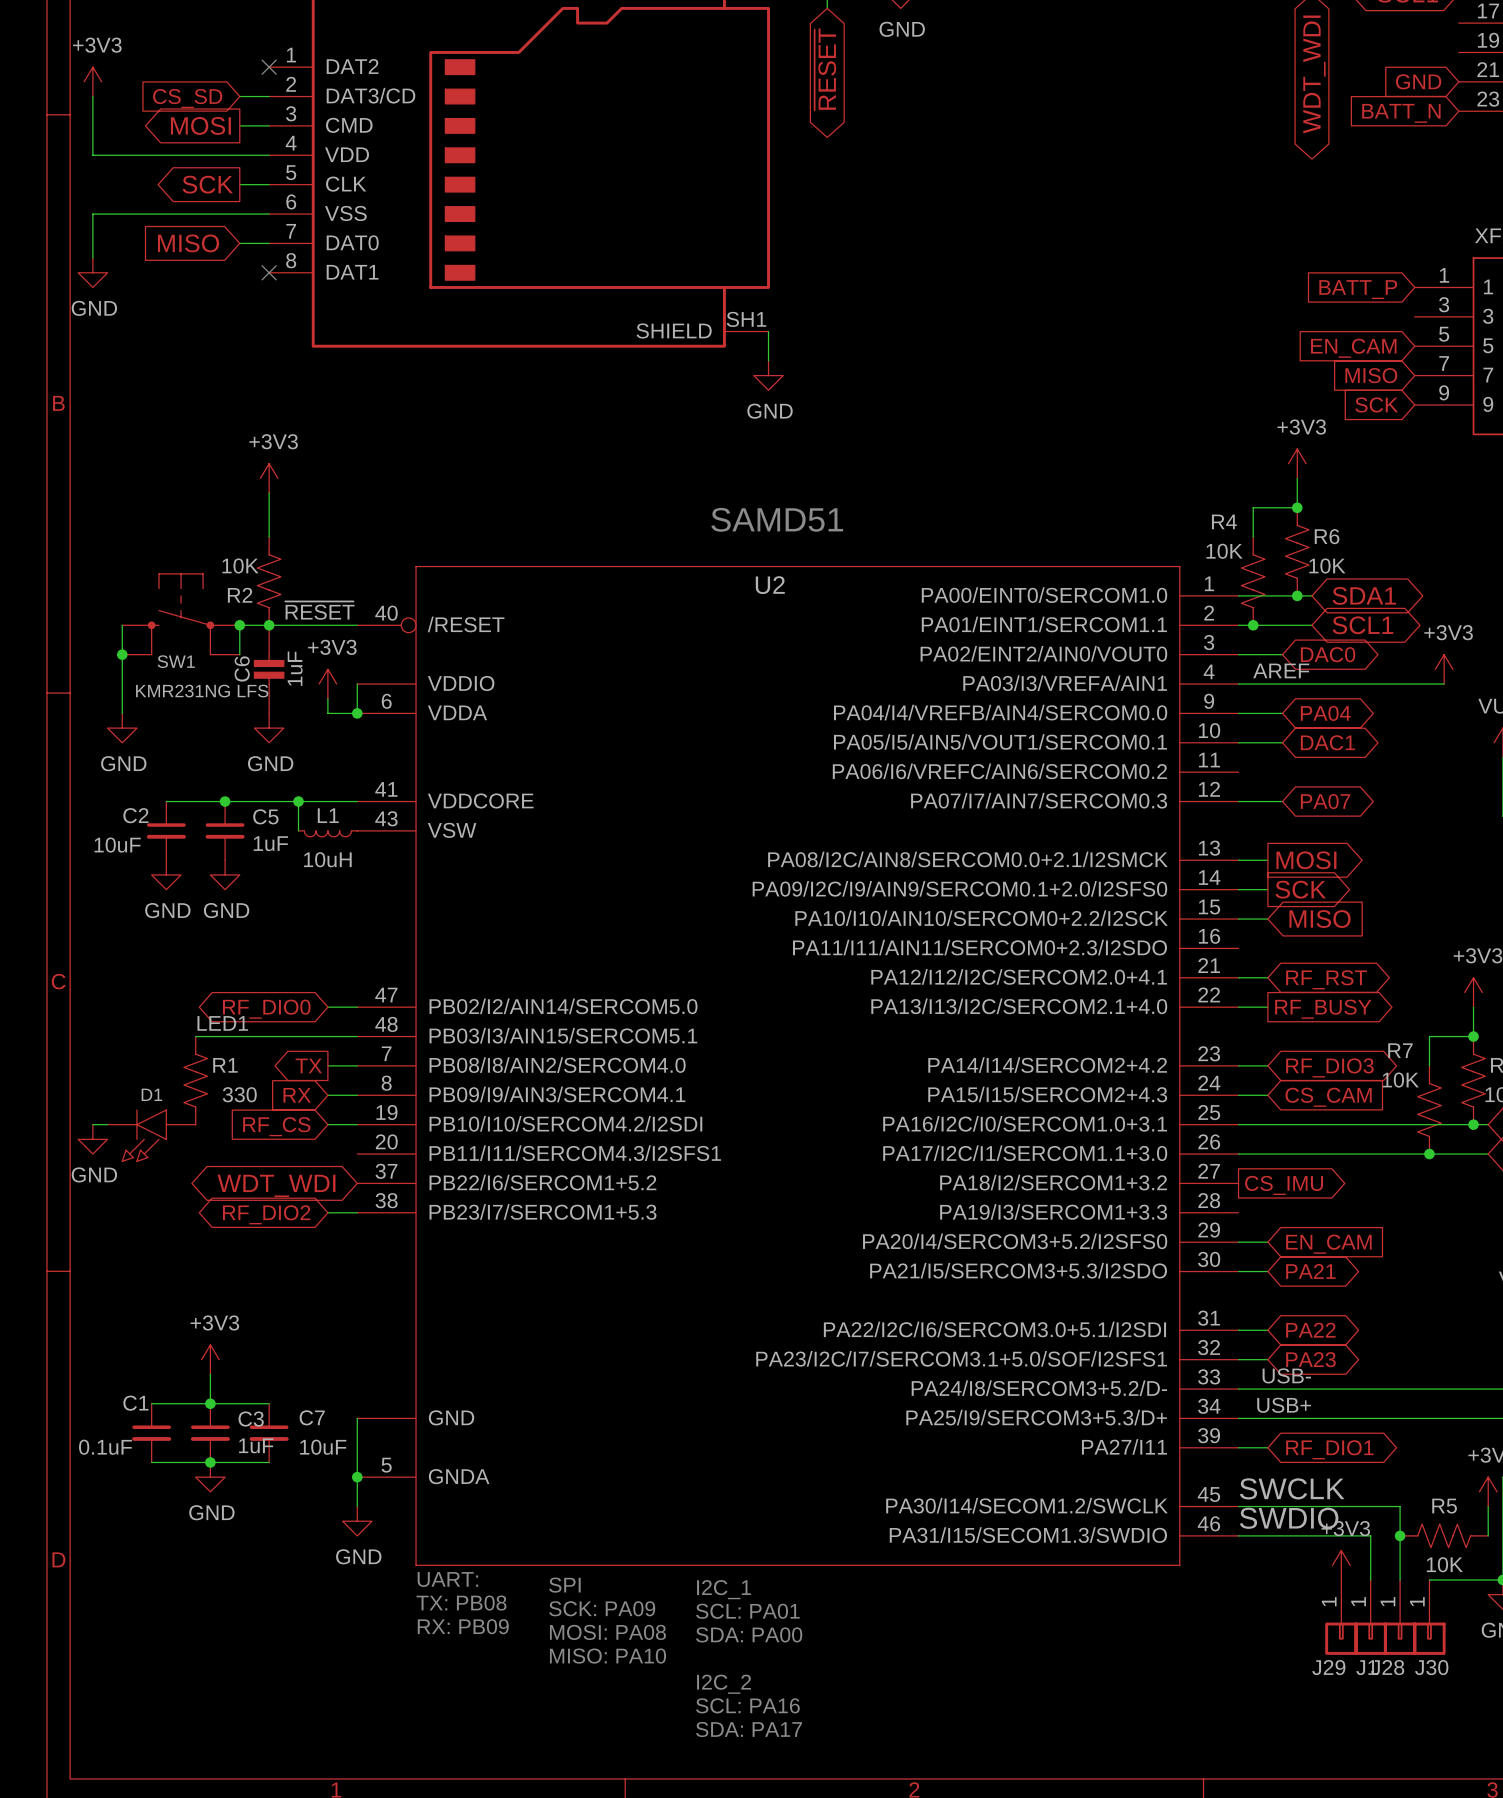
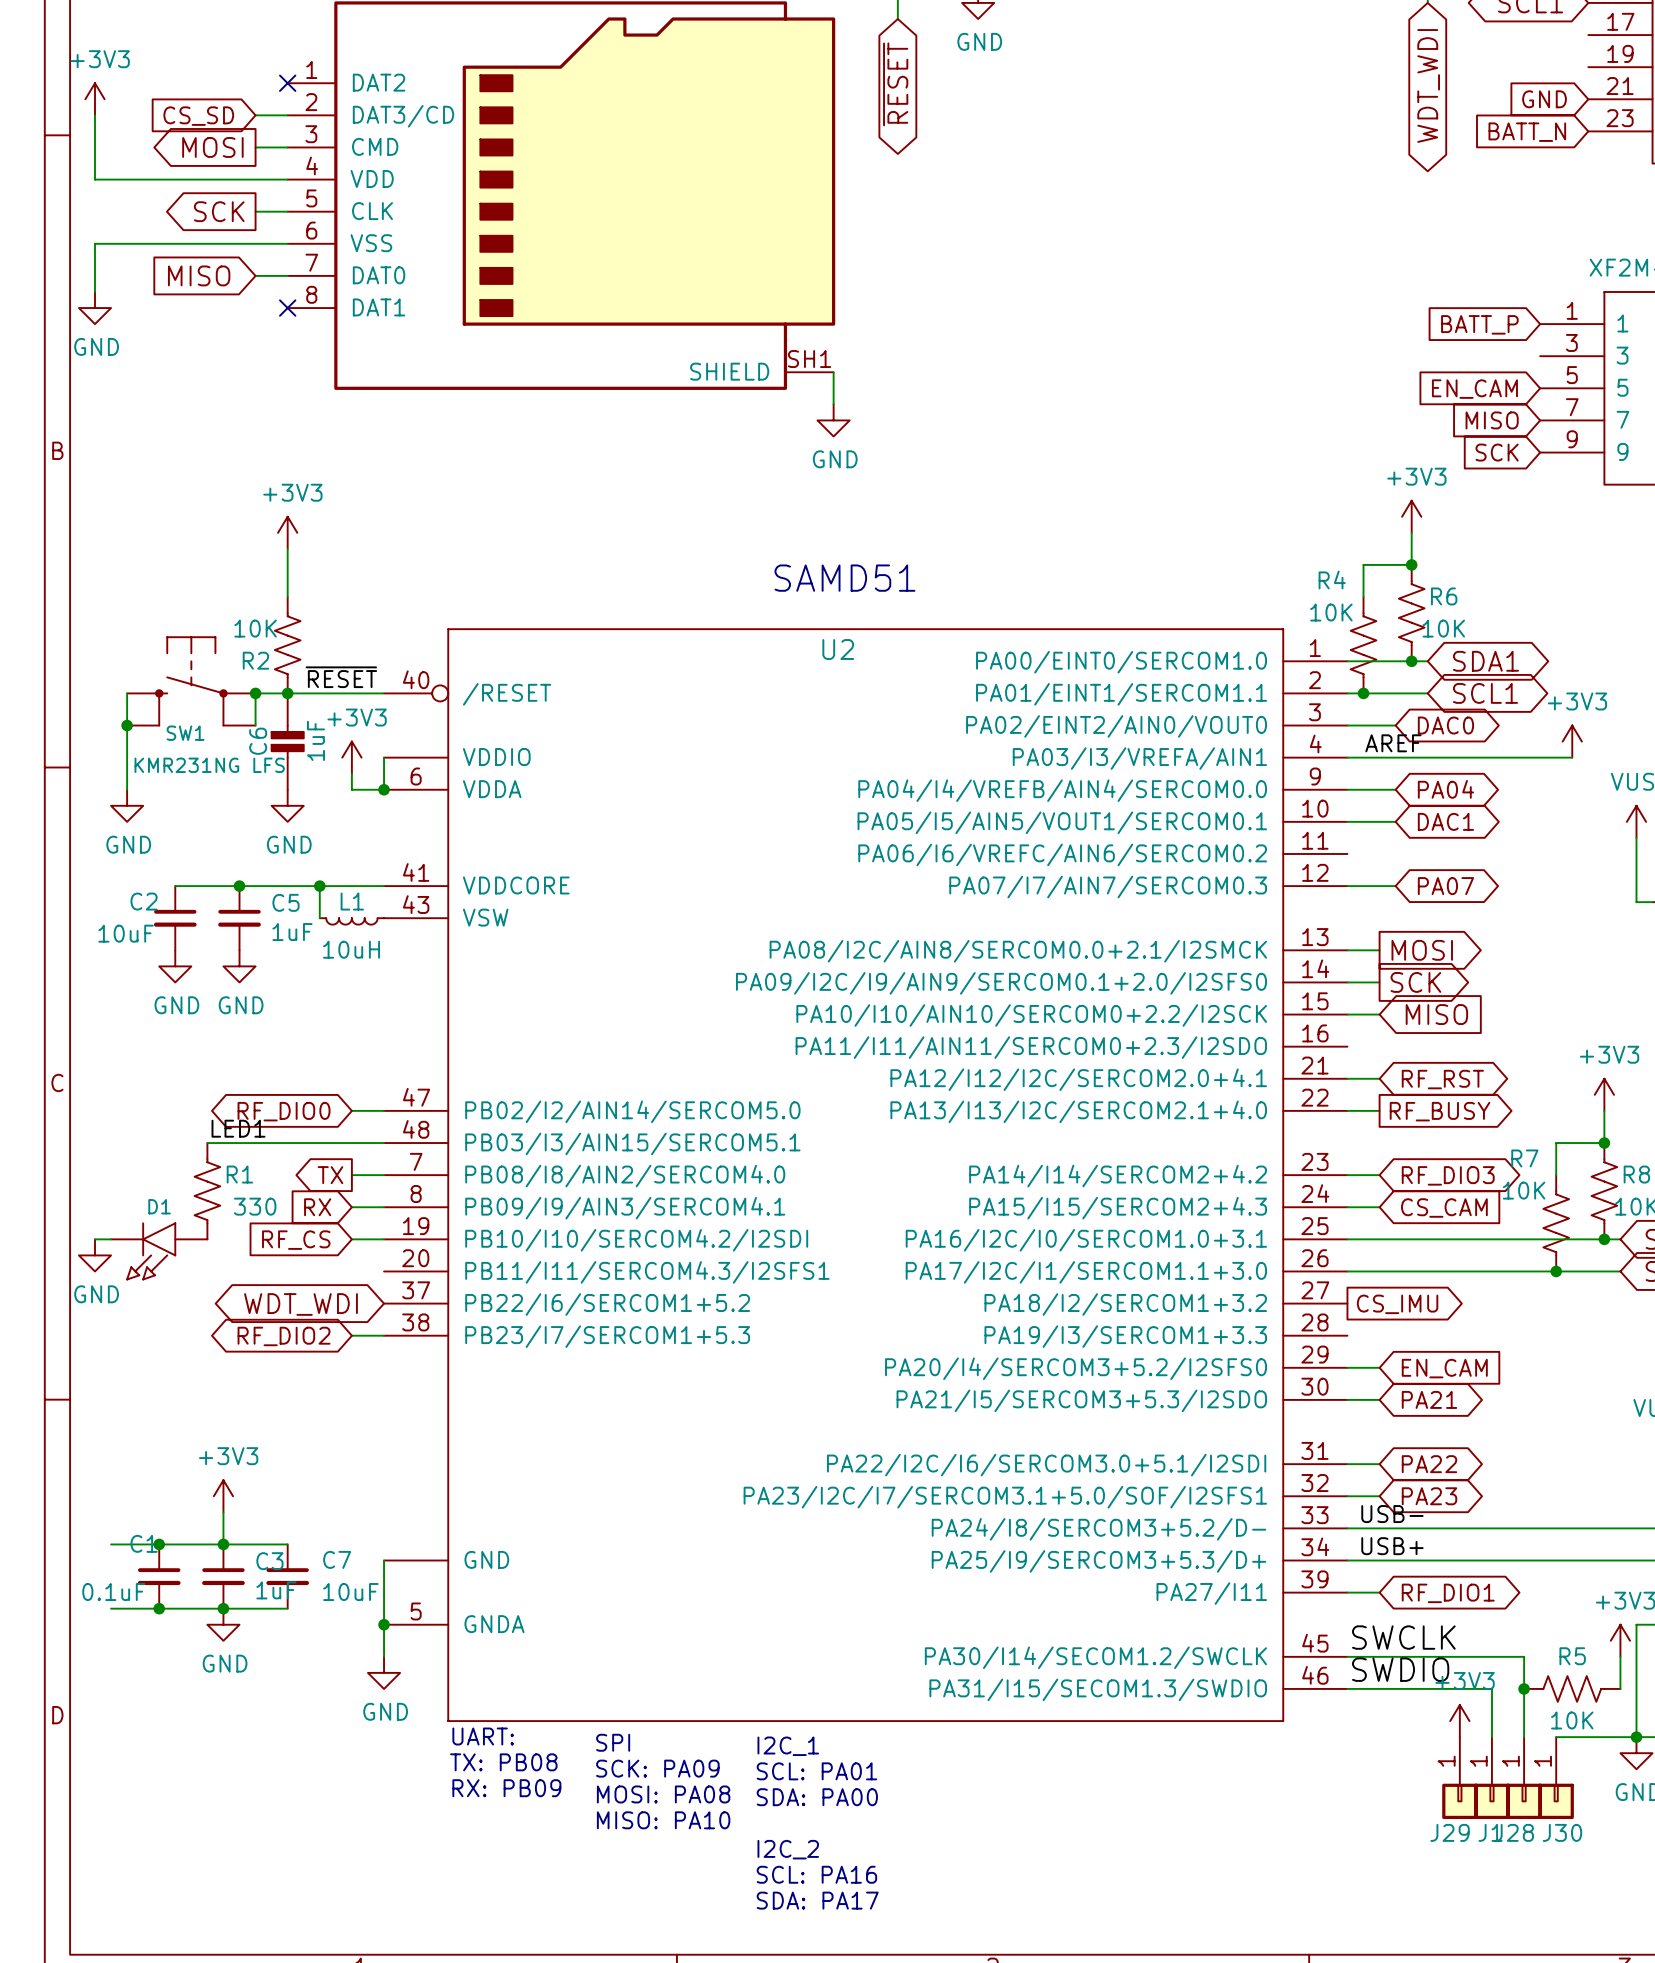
wire: none -> (111, 1544) (159, 1544)
junction: none -> (159, 1544)
wire: none -> (111, 1608) (159, 1608)
junction: none -> (159, 1608)

